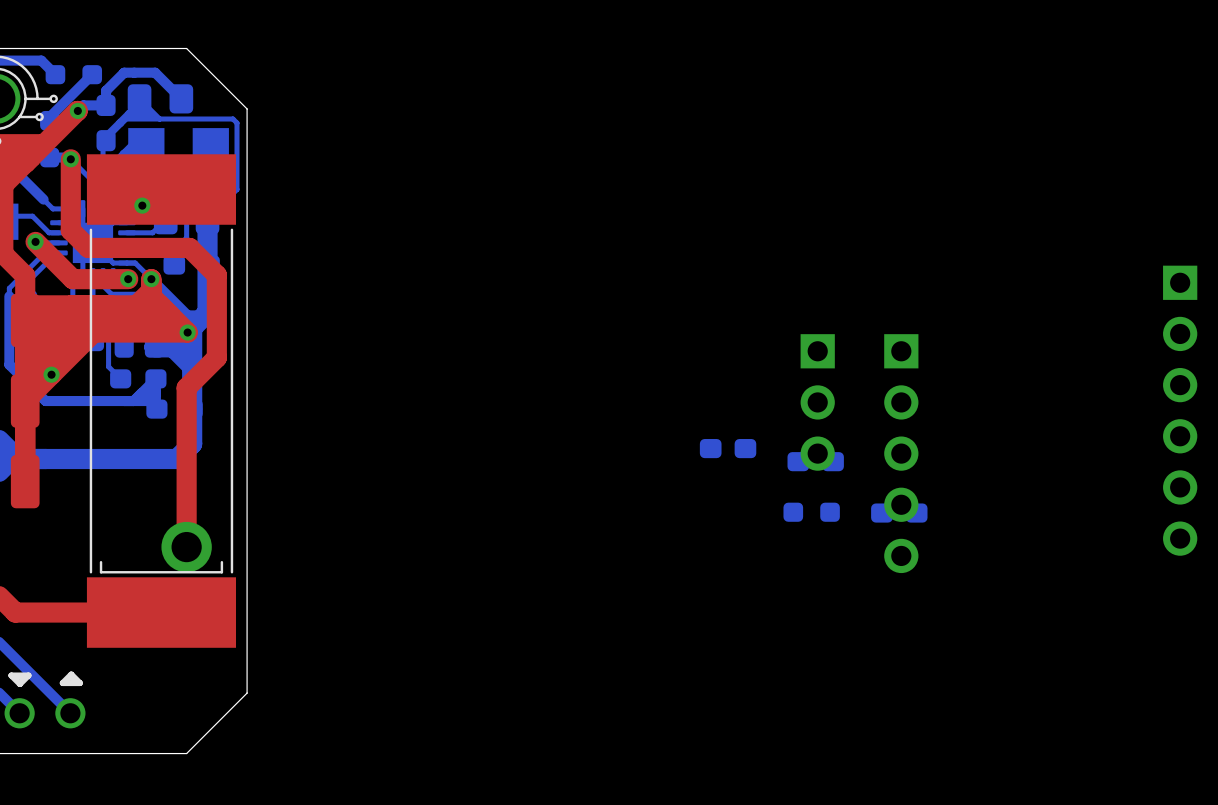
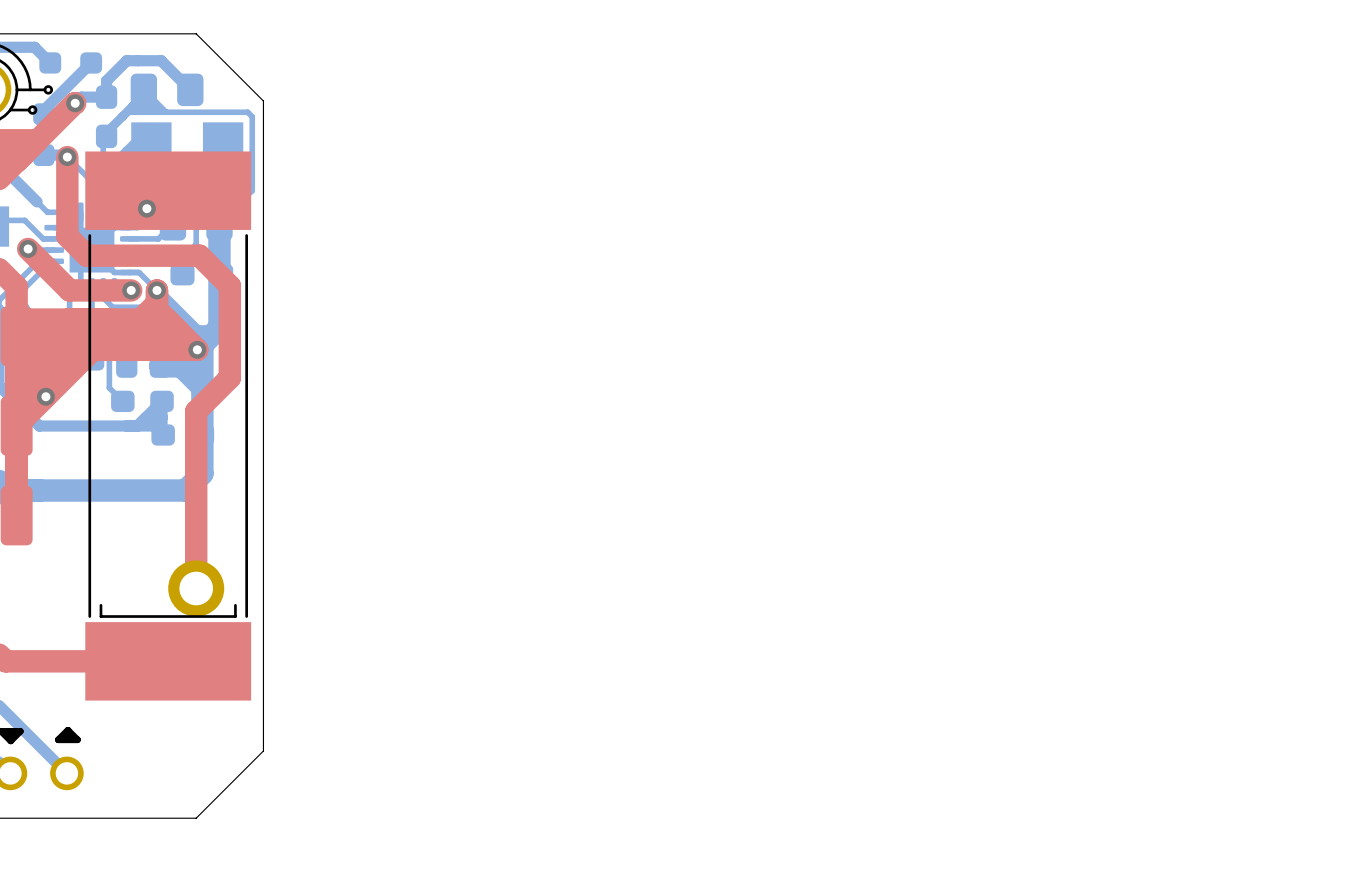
part: (817, 402) -> none
part: (1180, 410) -> none
part: (728, 448) -> none
part: (901, 453) -> none
part: (815, 461) -> none
part: (811, 512) -> none
part: (899, 513) -> none

